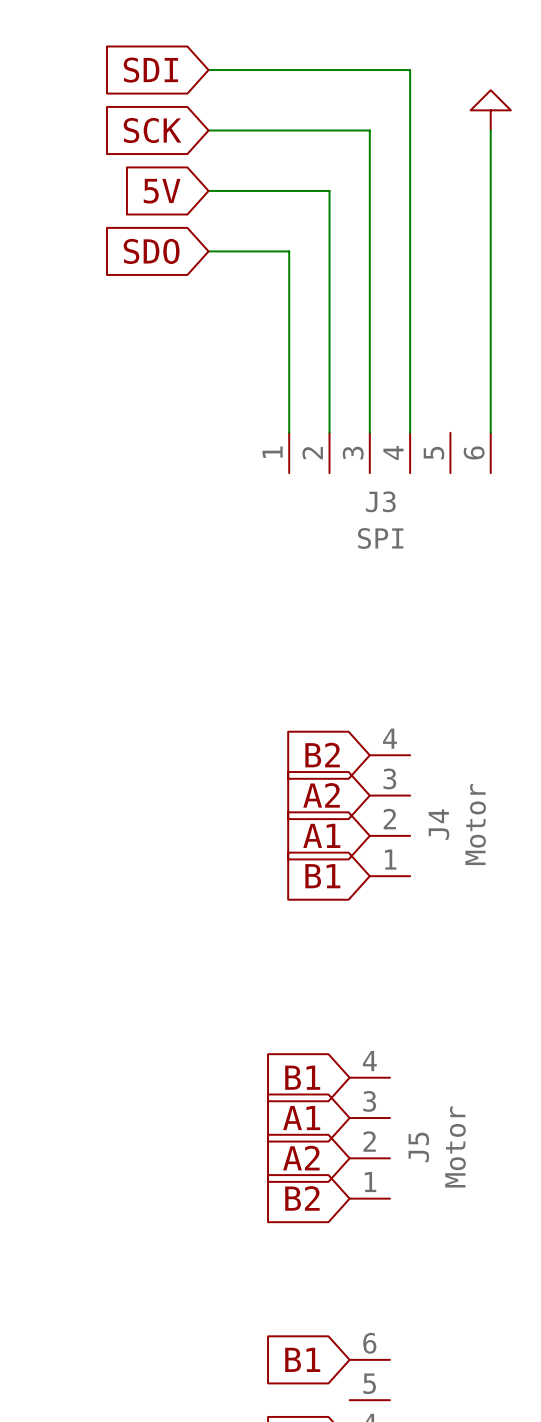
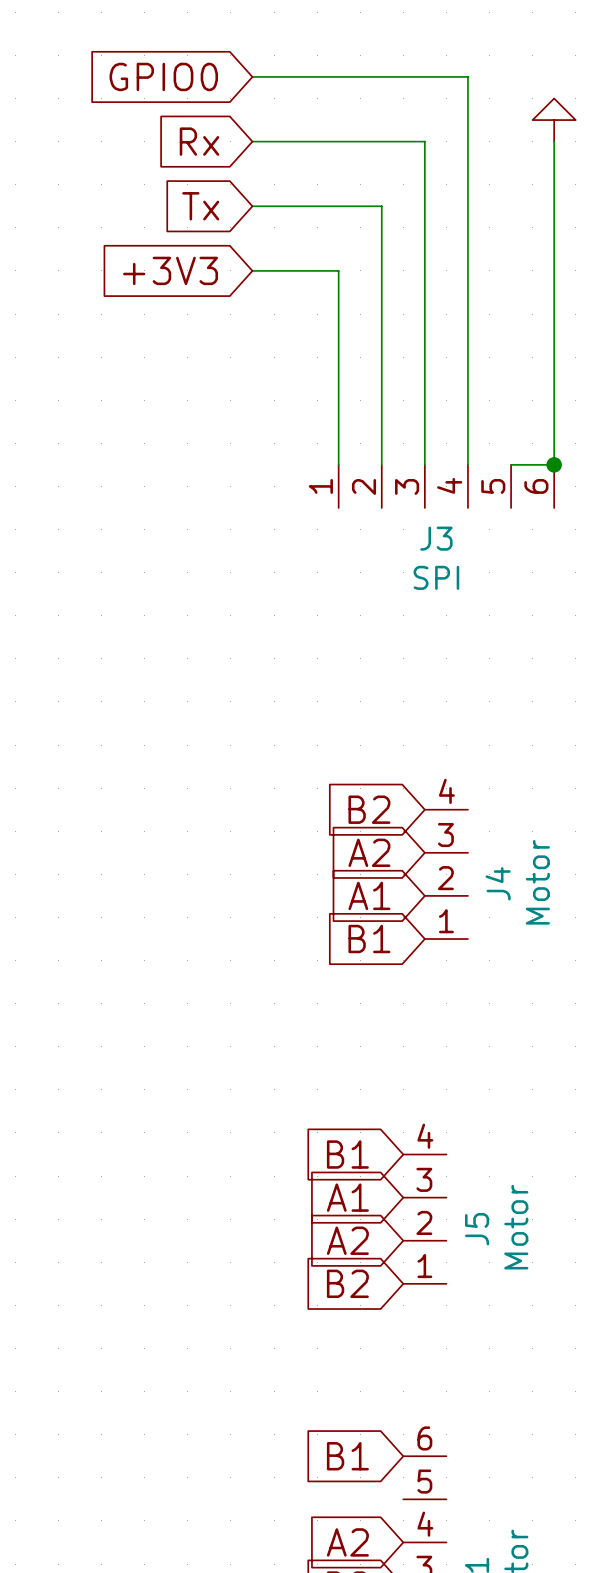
global label: SDI (150, 70) -> GPIO0 (163, 76)
global label: SCK (152, 130) -> Rx (199, 141)
global label: 5V (162, 191) -> Tx (200, 206)
global label: SDO (151, 251) -> +3V3 (170, 270)
wire: none -> (511, 464) (554, 464)
junction: none -> (554, 464)

